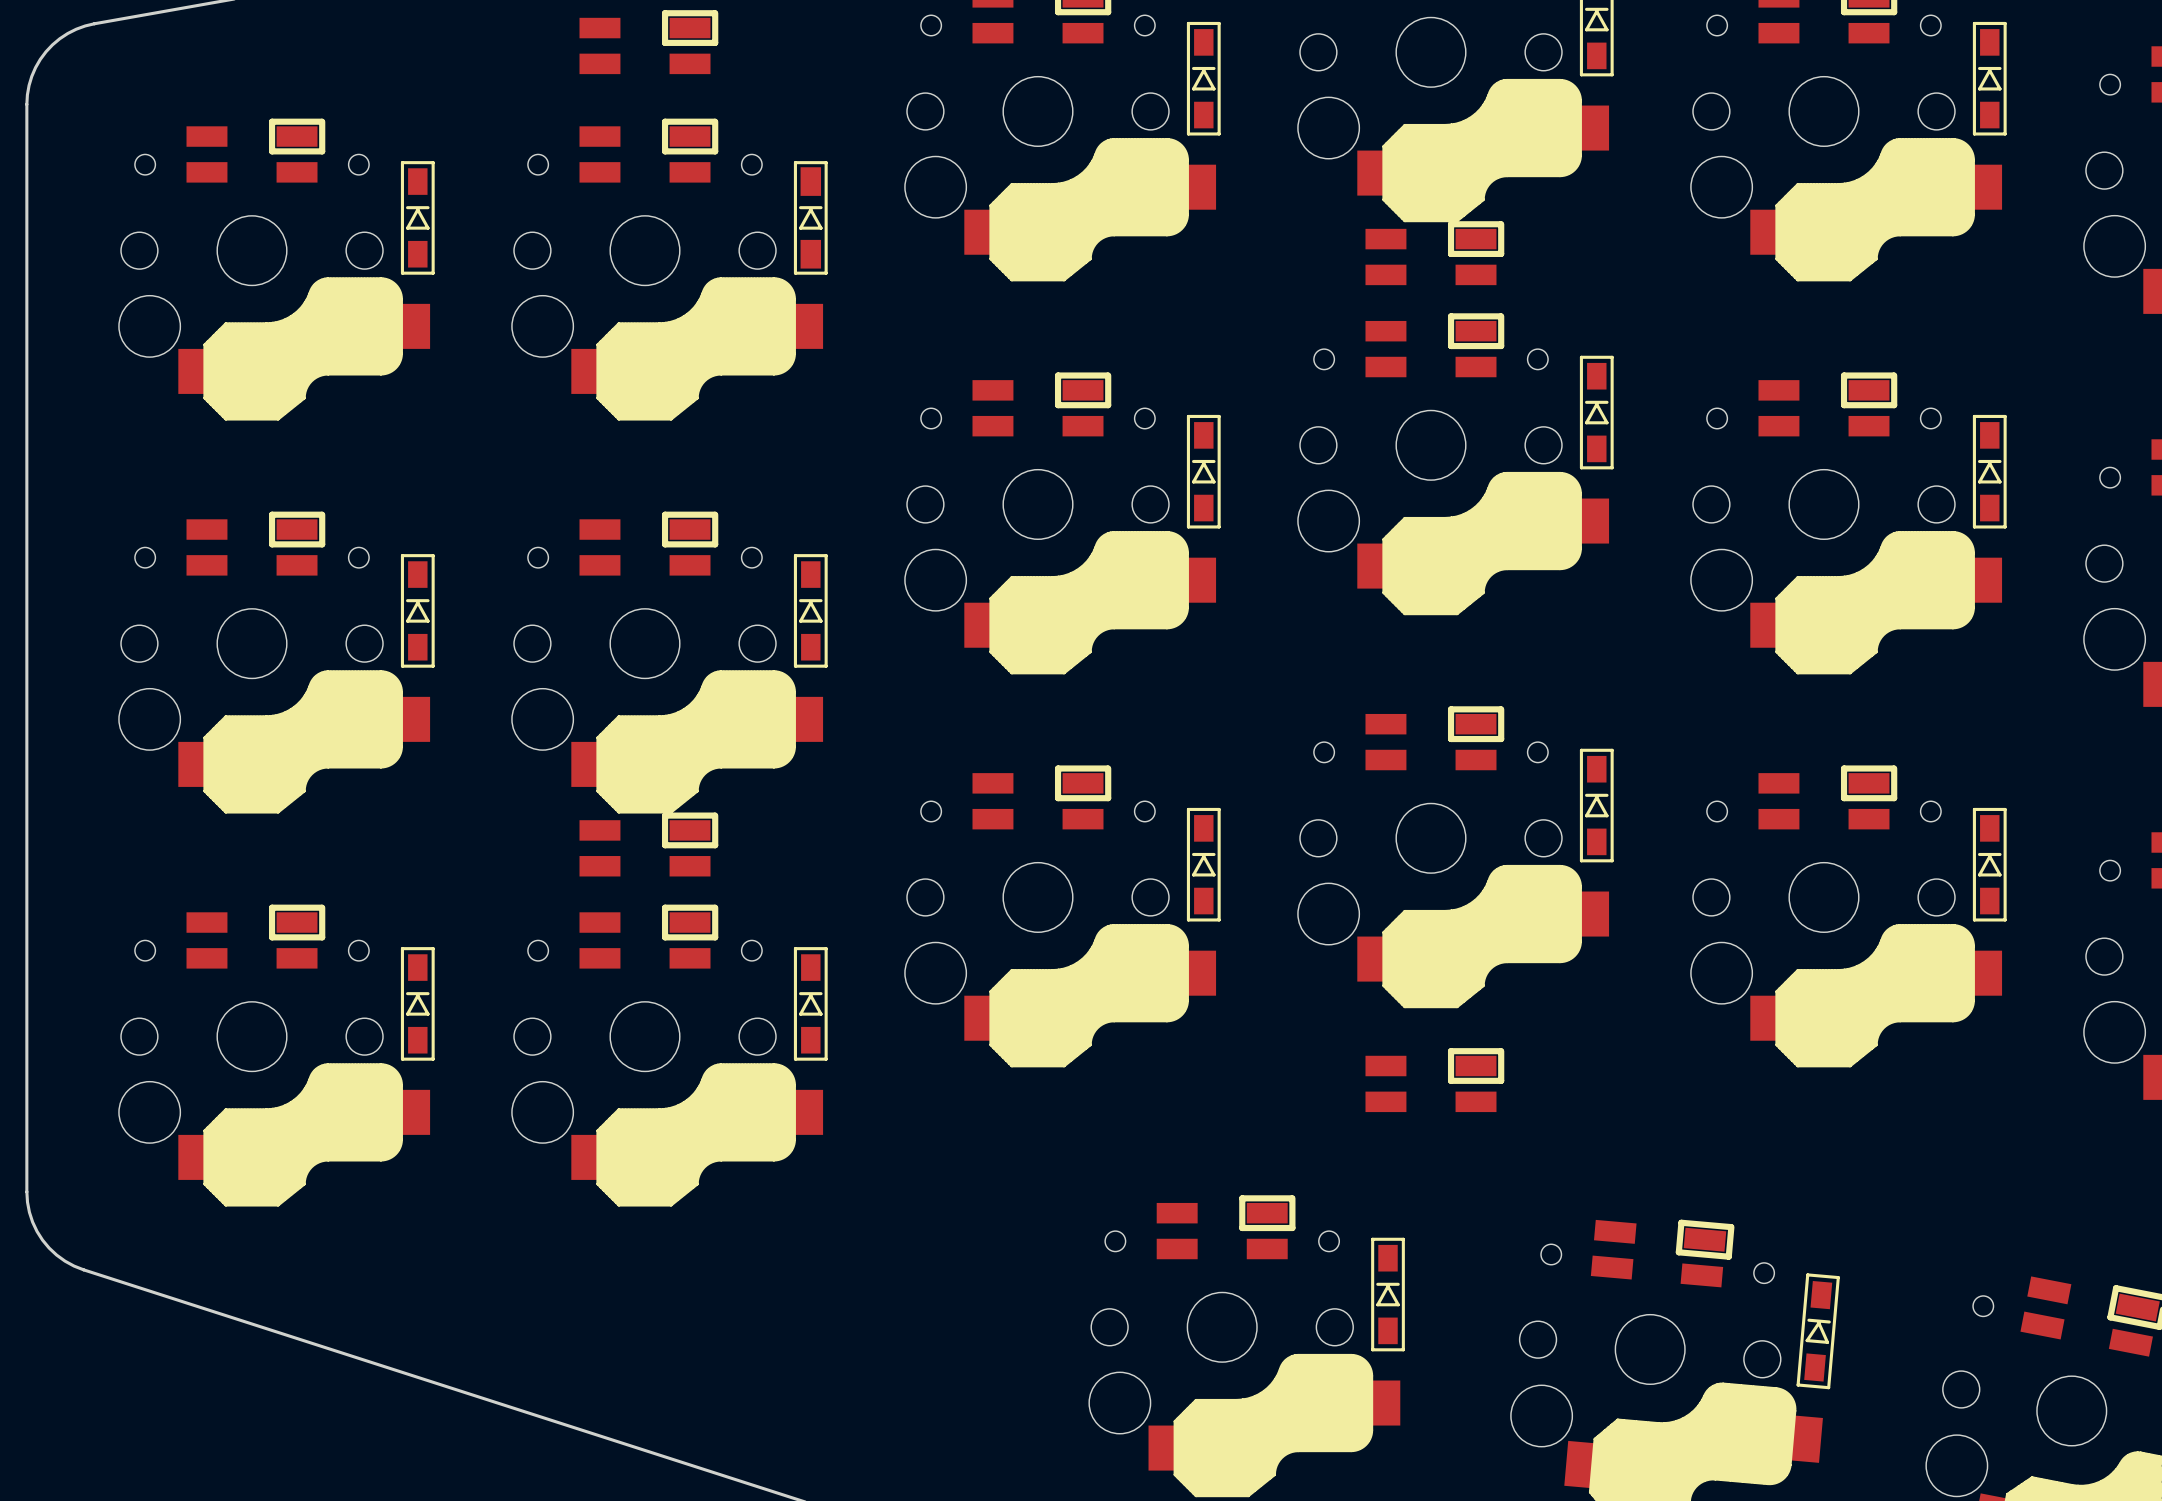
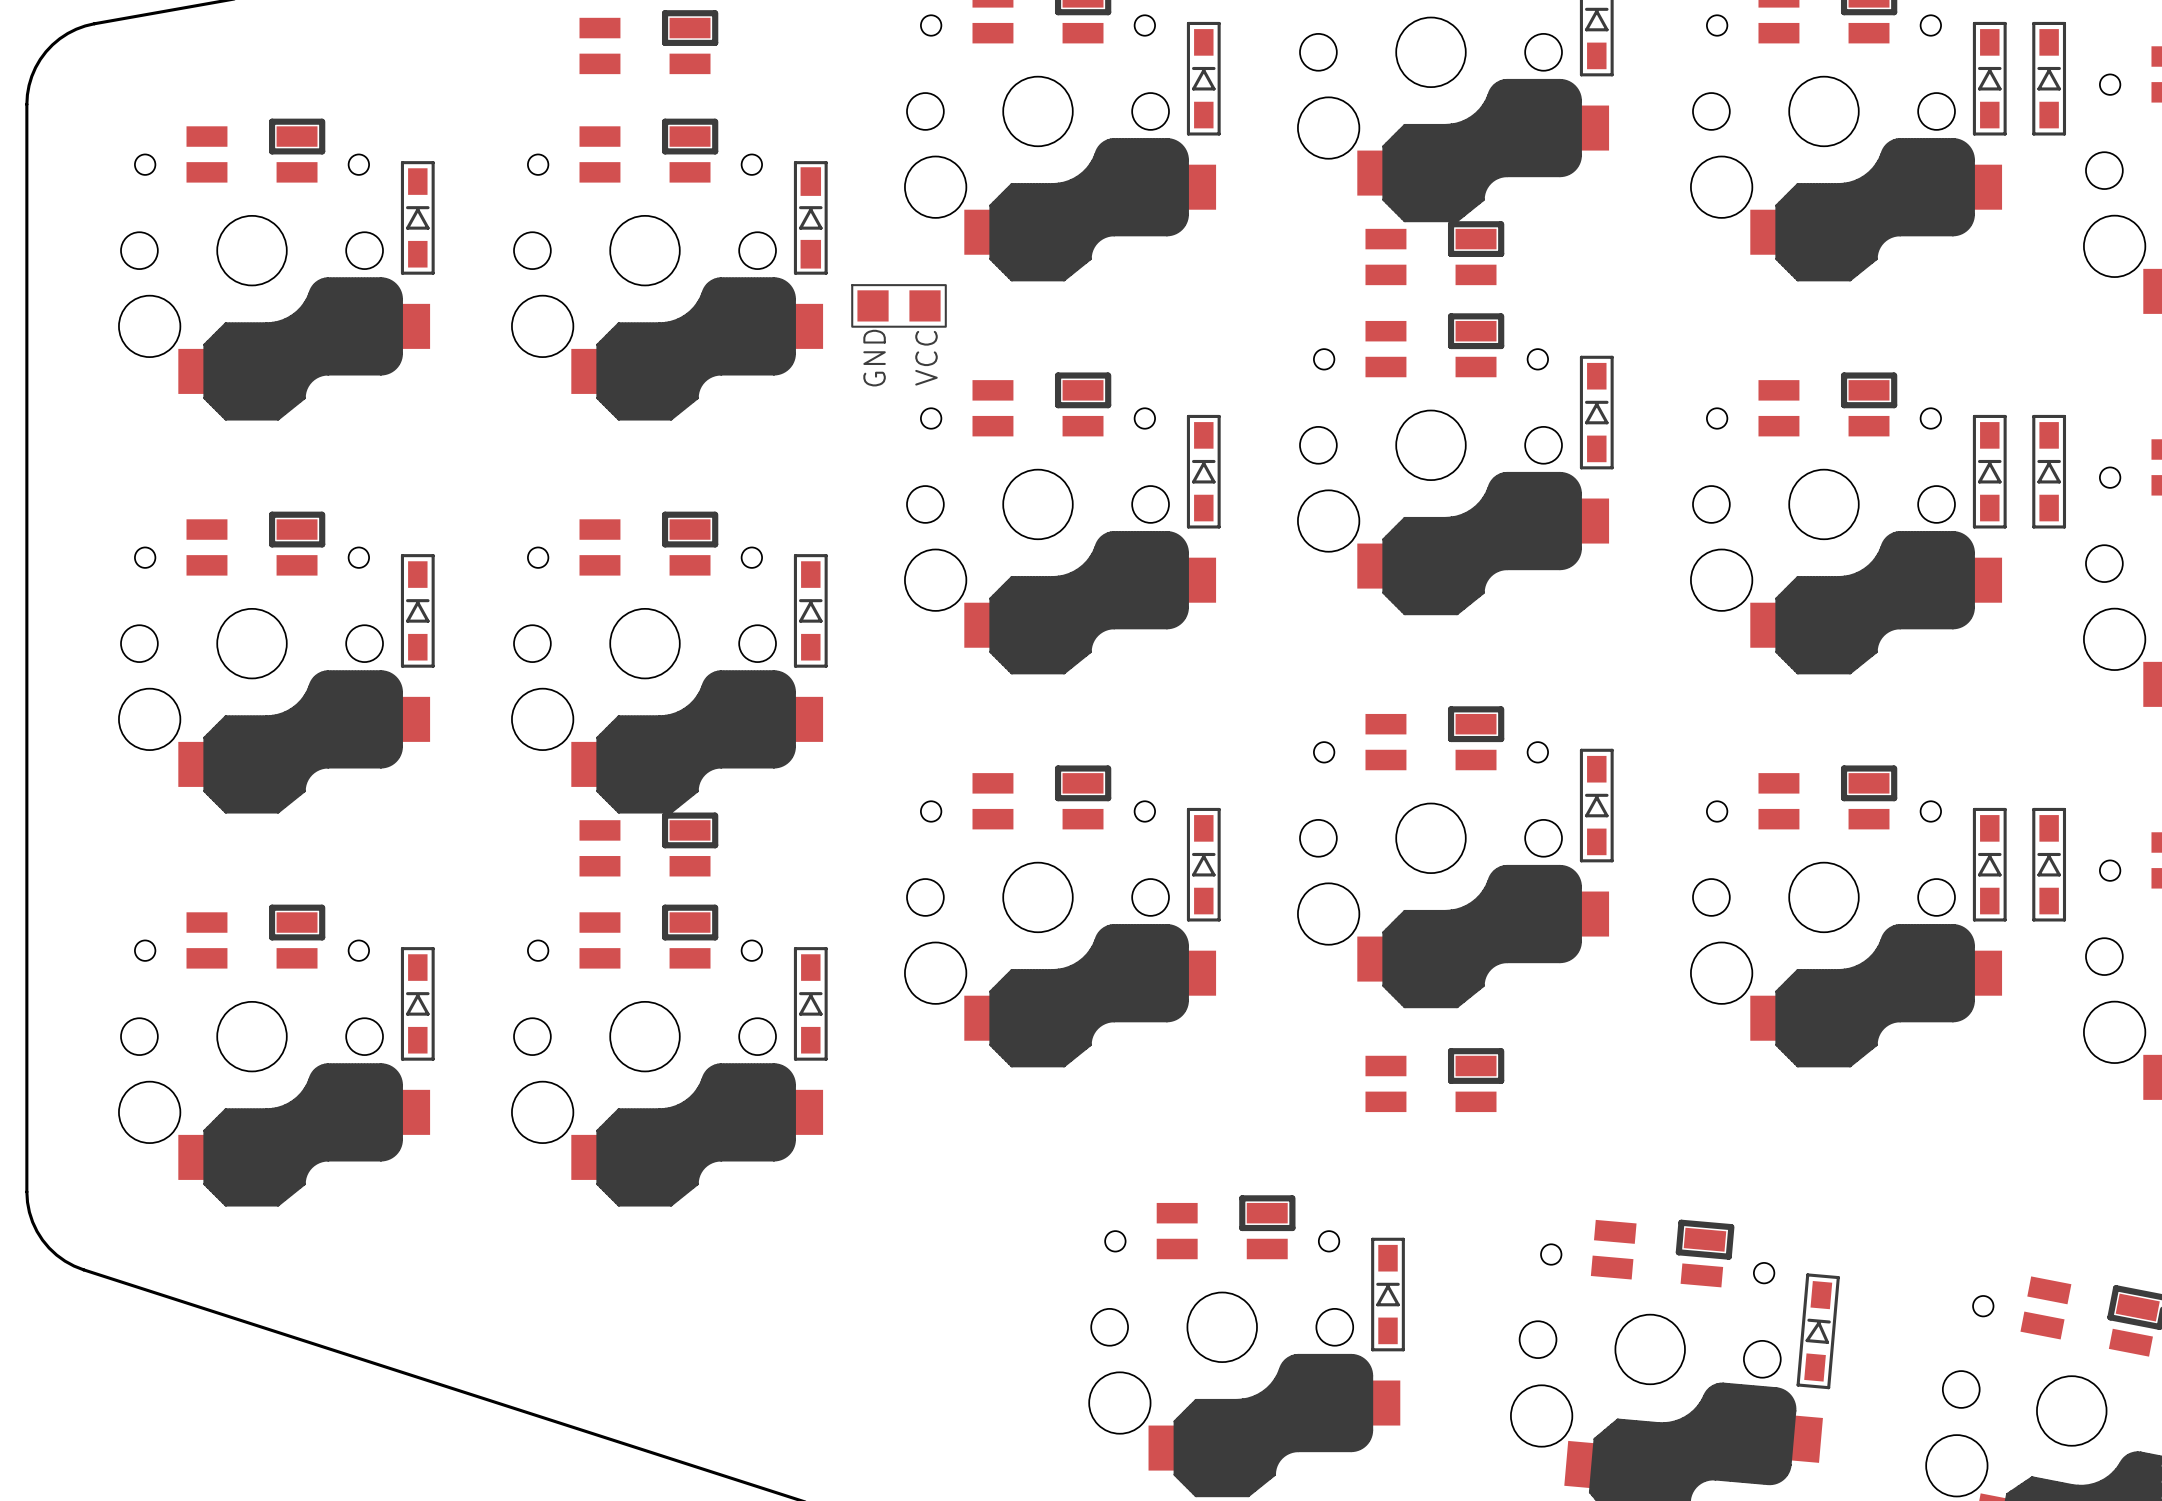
part: none -> (2049, 78)
part: none -> (899, 305)
part: none -> (2049, 471)
part: none -> (2049, 864)

